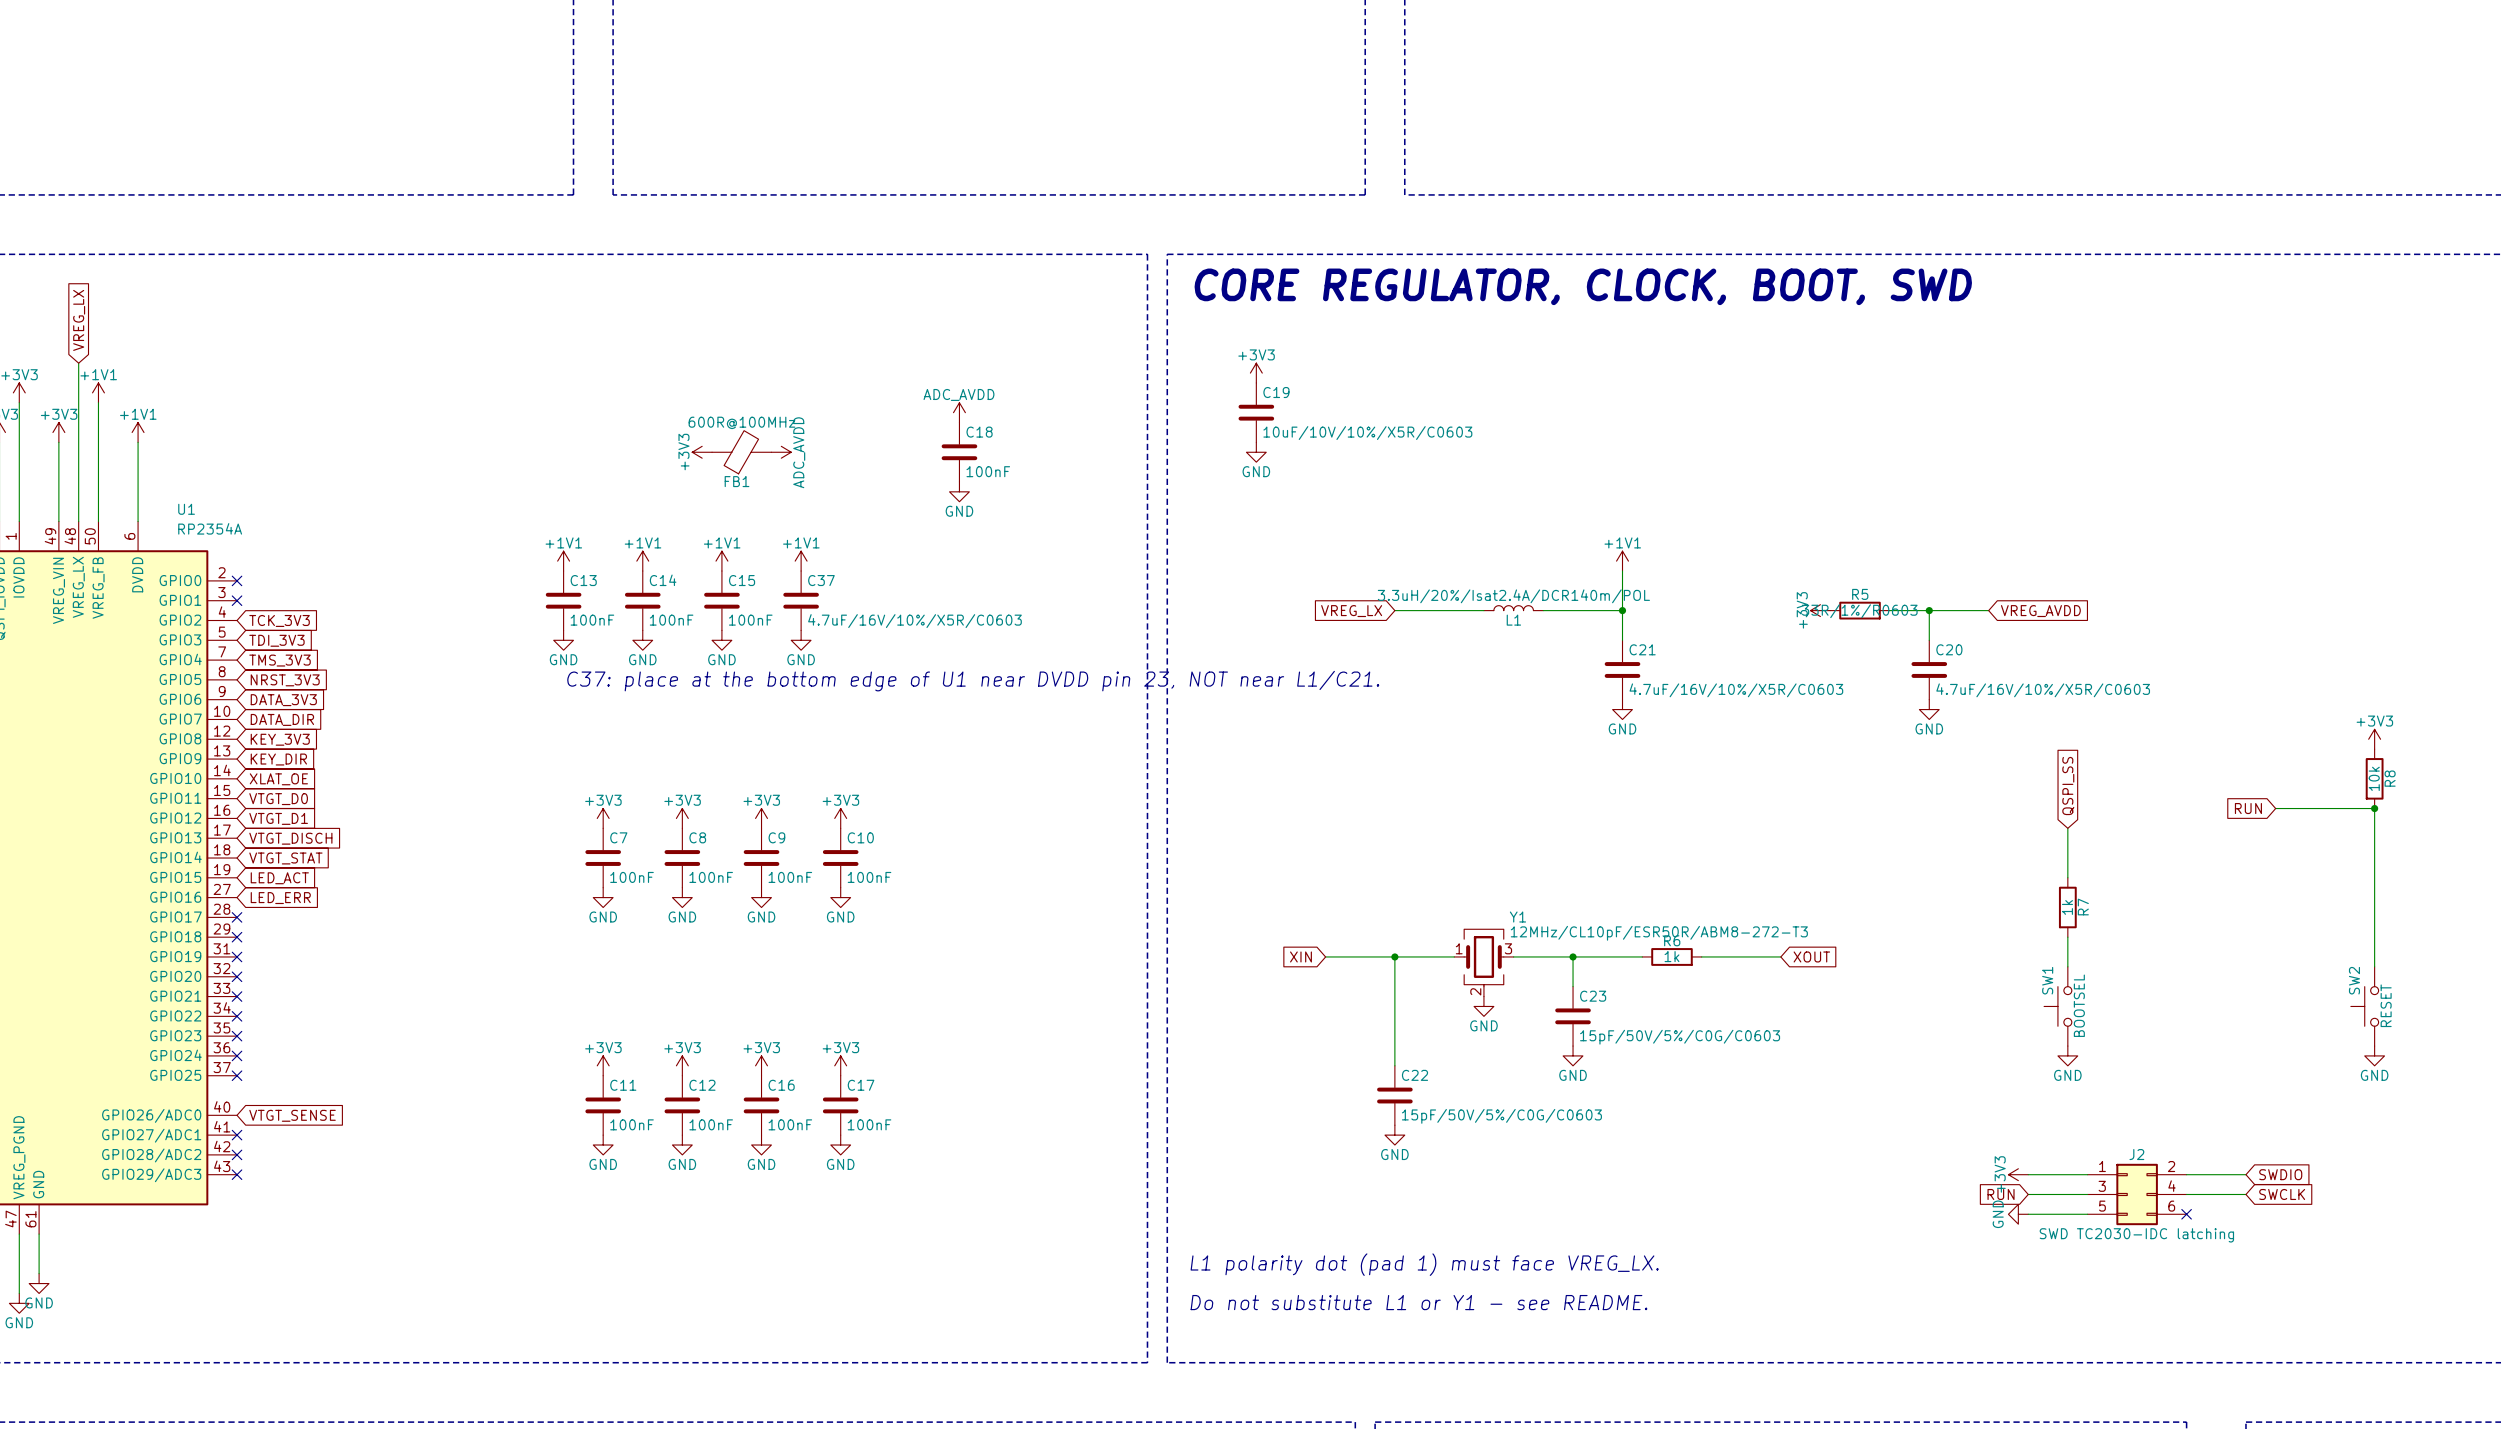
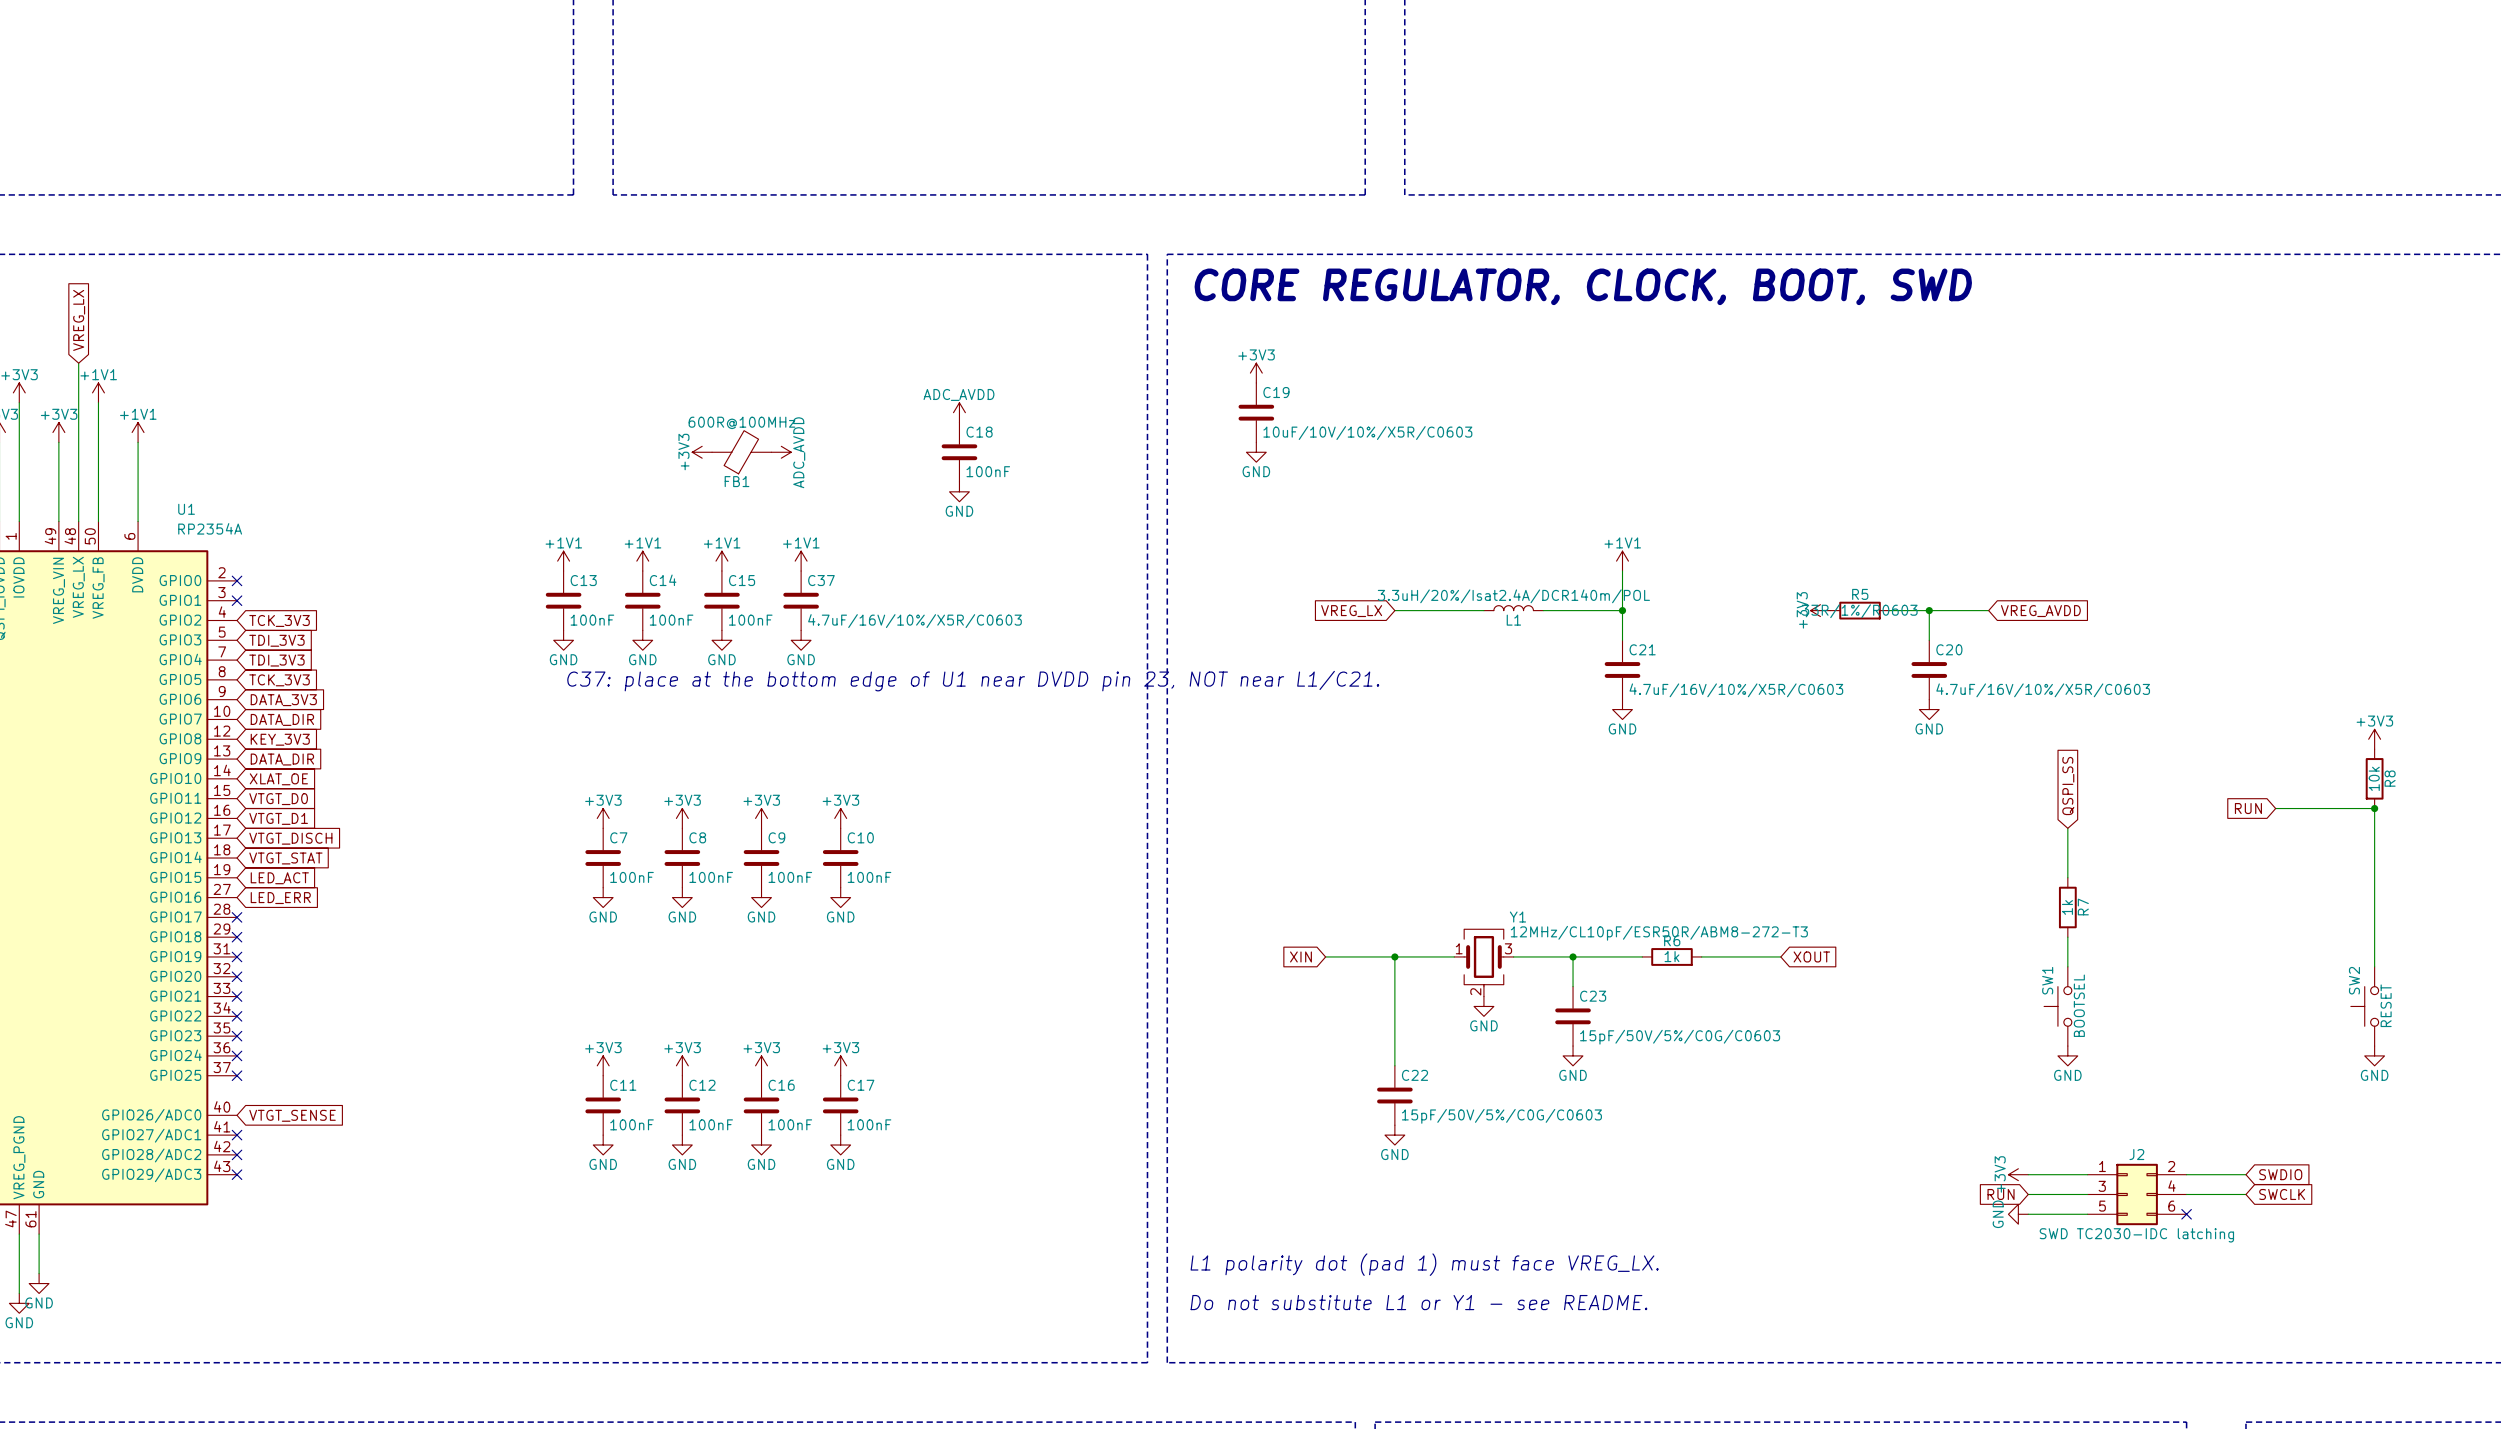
global label: TMS_3V3 (280, 660) -> TDI_3V3 (276, 660)
global label: NRST_3V3 (285, 680) -> TCK_3V3 (279, 680)
global label: KEY_DIR (278, 759) -> DATA_DIR (282, 759)

